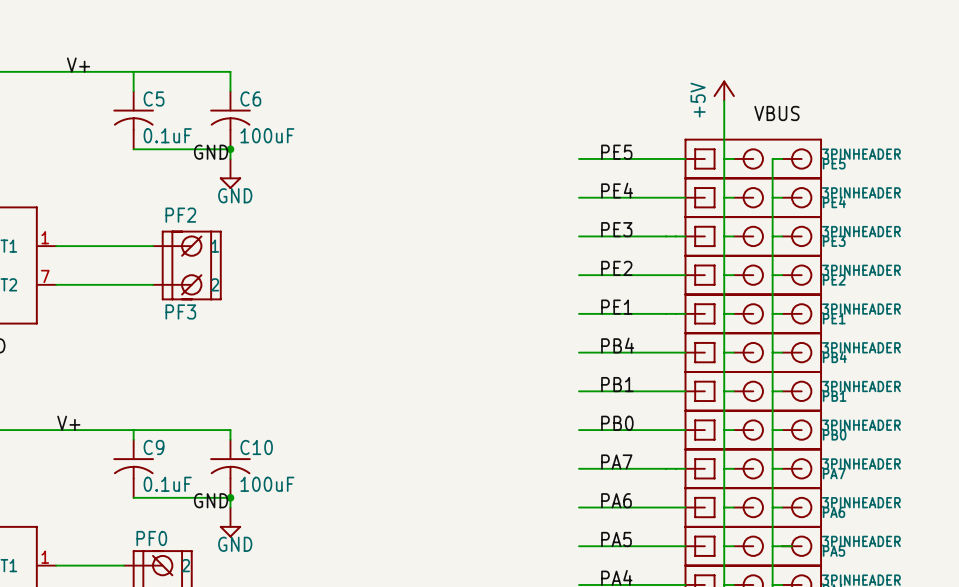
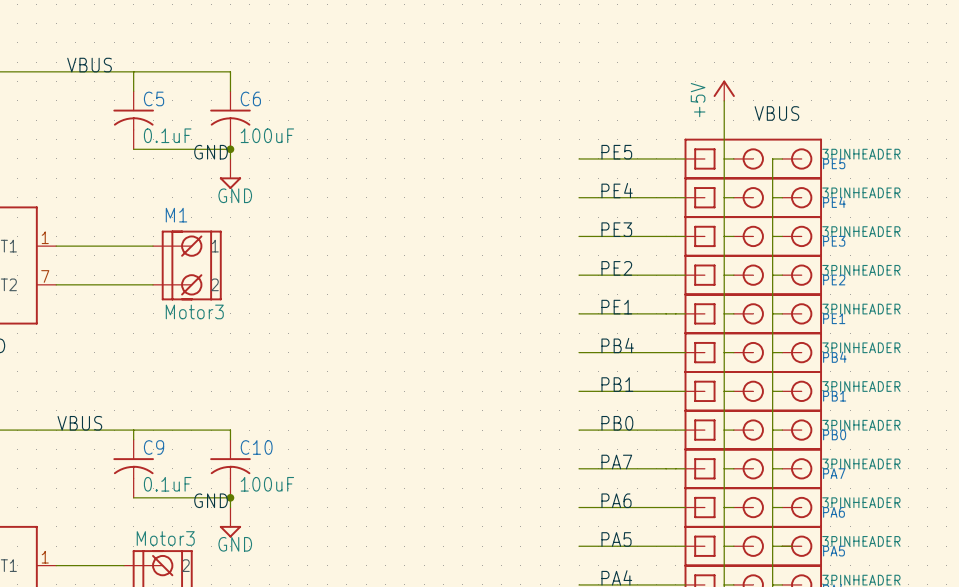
label: V+ (78, 65) -> VBUS (89, 65)
PF2 name: PF2 (180, 215) -> M1 (176, 215)
PF2 value: PF3 (180, 311) -> Motor3 (194, 311)
label: V+ (68, 423) -> VBUS (79, 423)
part value: PF0 (151, 538) -> Motor3 (165, 538)

